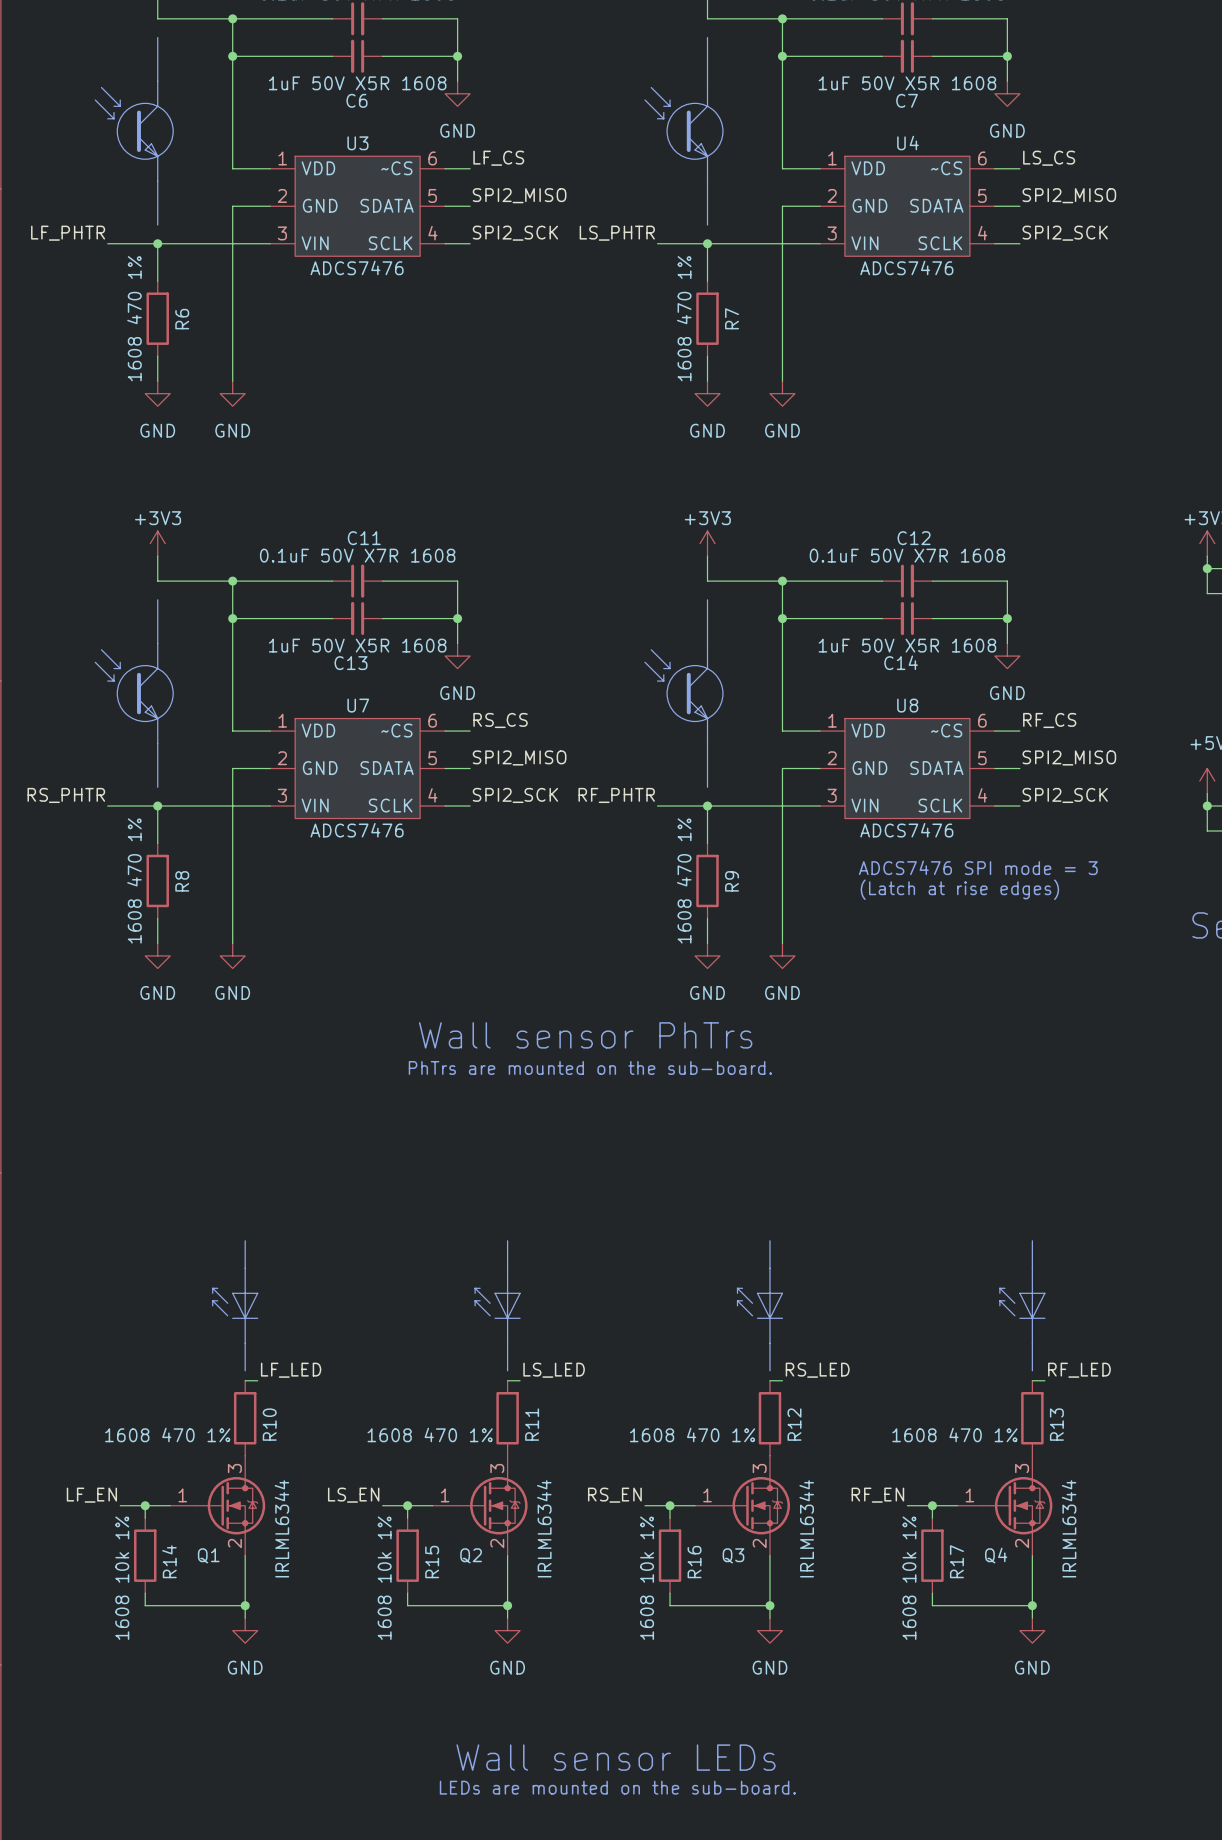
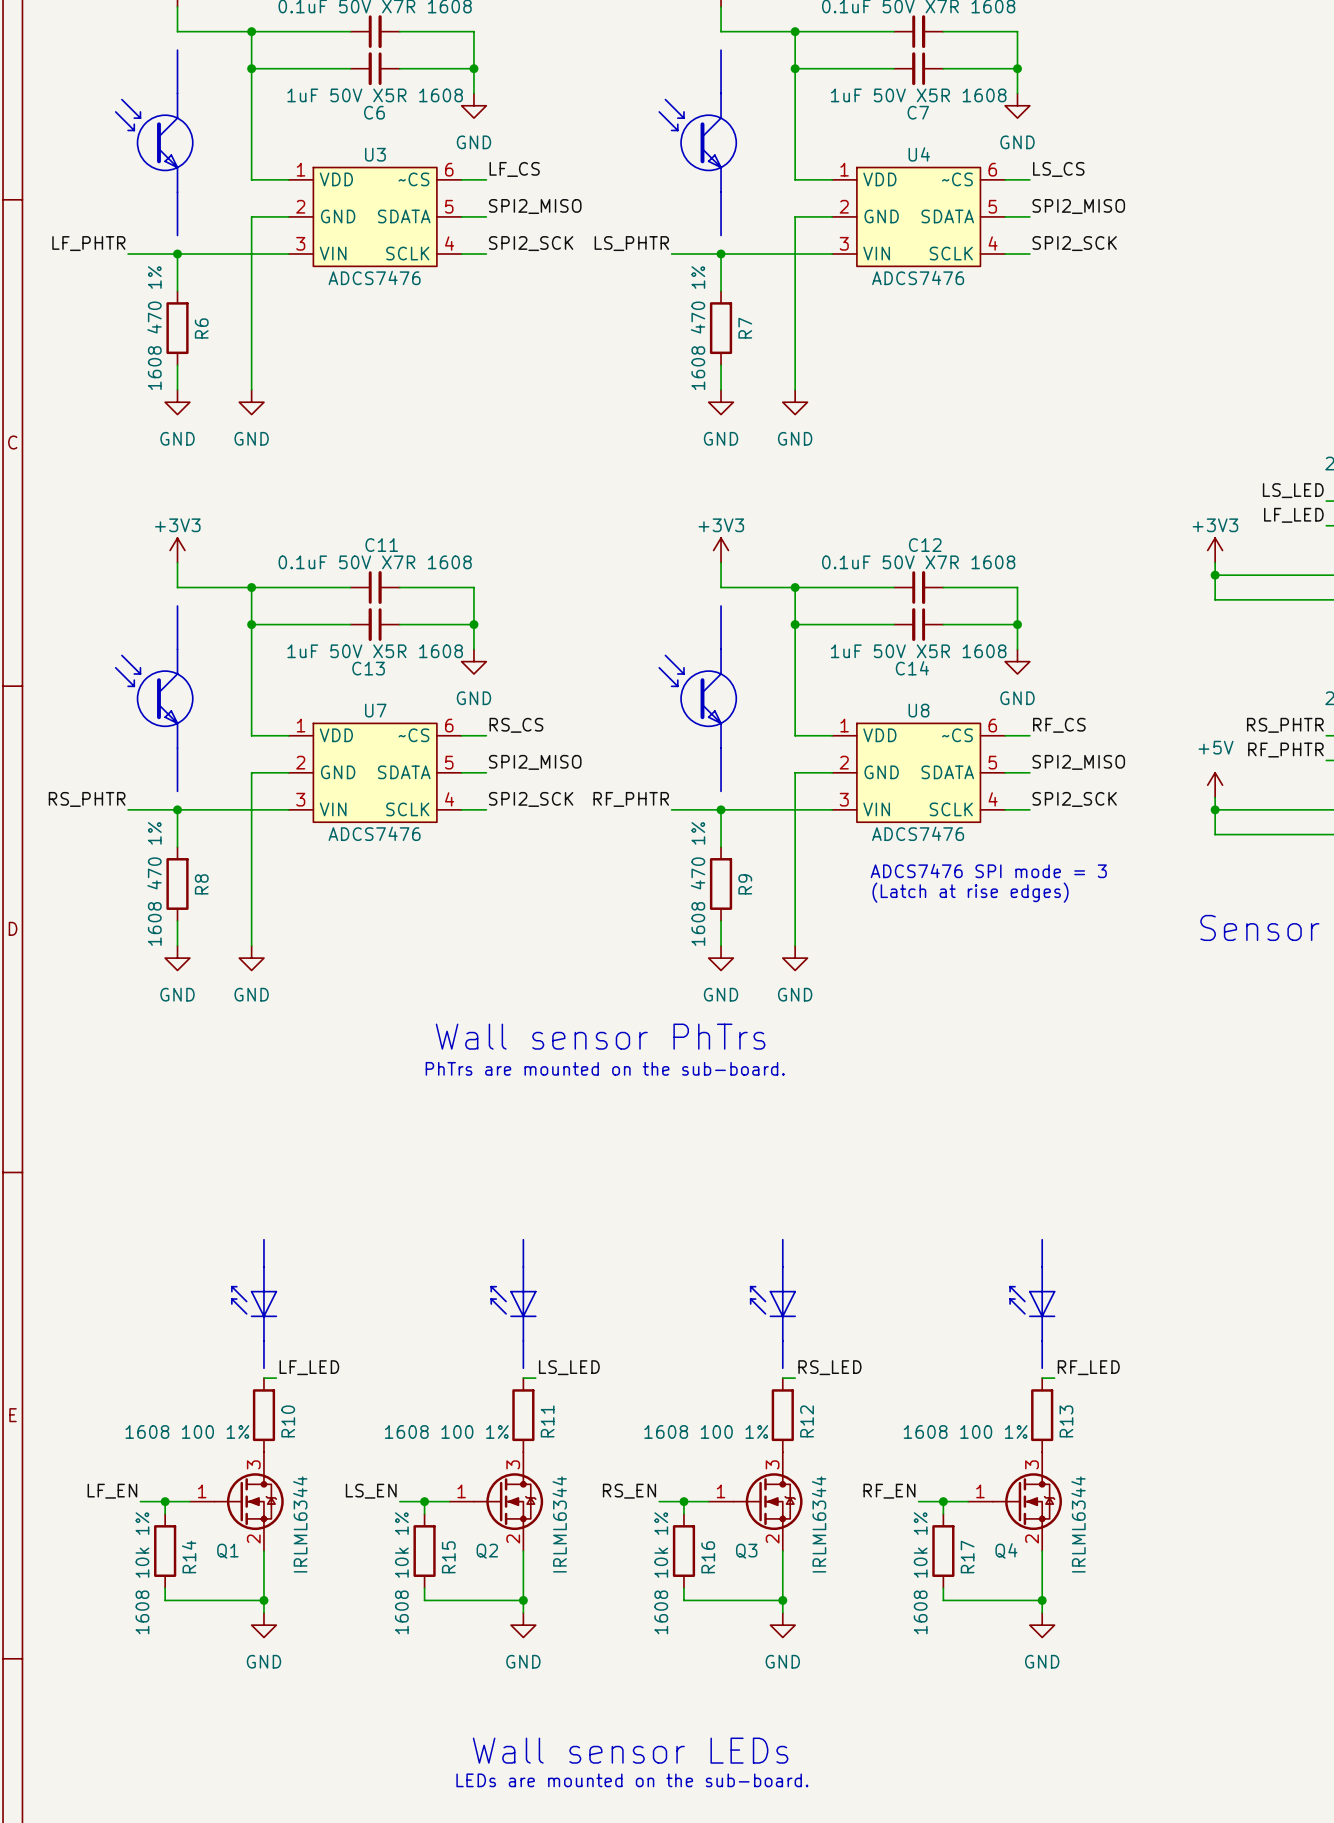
R10 text: 1608 470 1% (167, 1434) -> 1608 100 1% (187, 1431)
R11 text: 1608 470 1% (430, 1434) -> 1608 100 1% (446, 1431)
R12 text: 1608 470 1% (692, 1434) -> 1608 100 1% (706, 1431)
R13 text: 1608 470 1% (954, 1434) -> 1608 100 1% (965, 1431)

